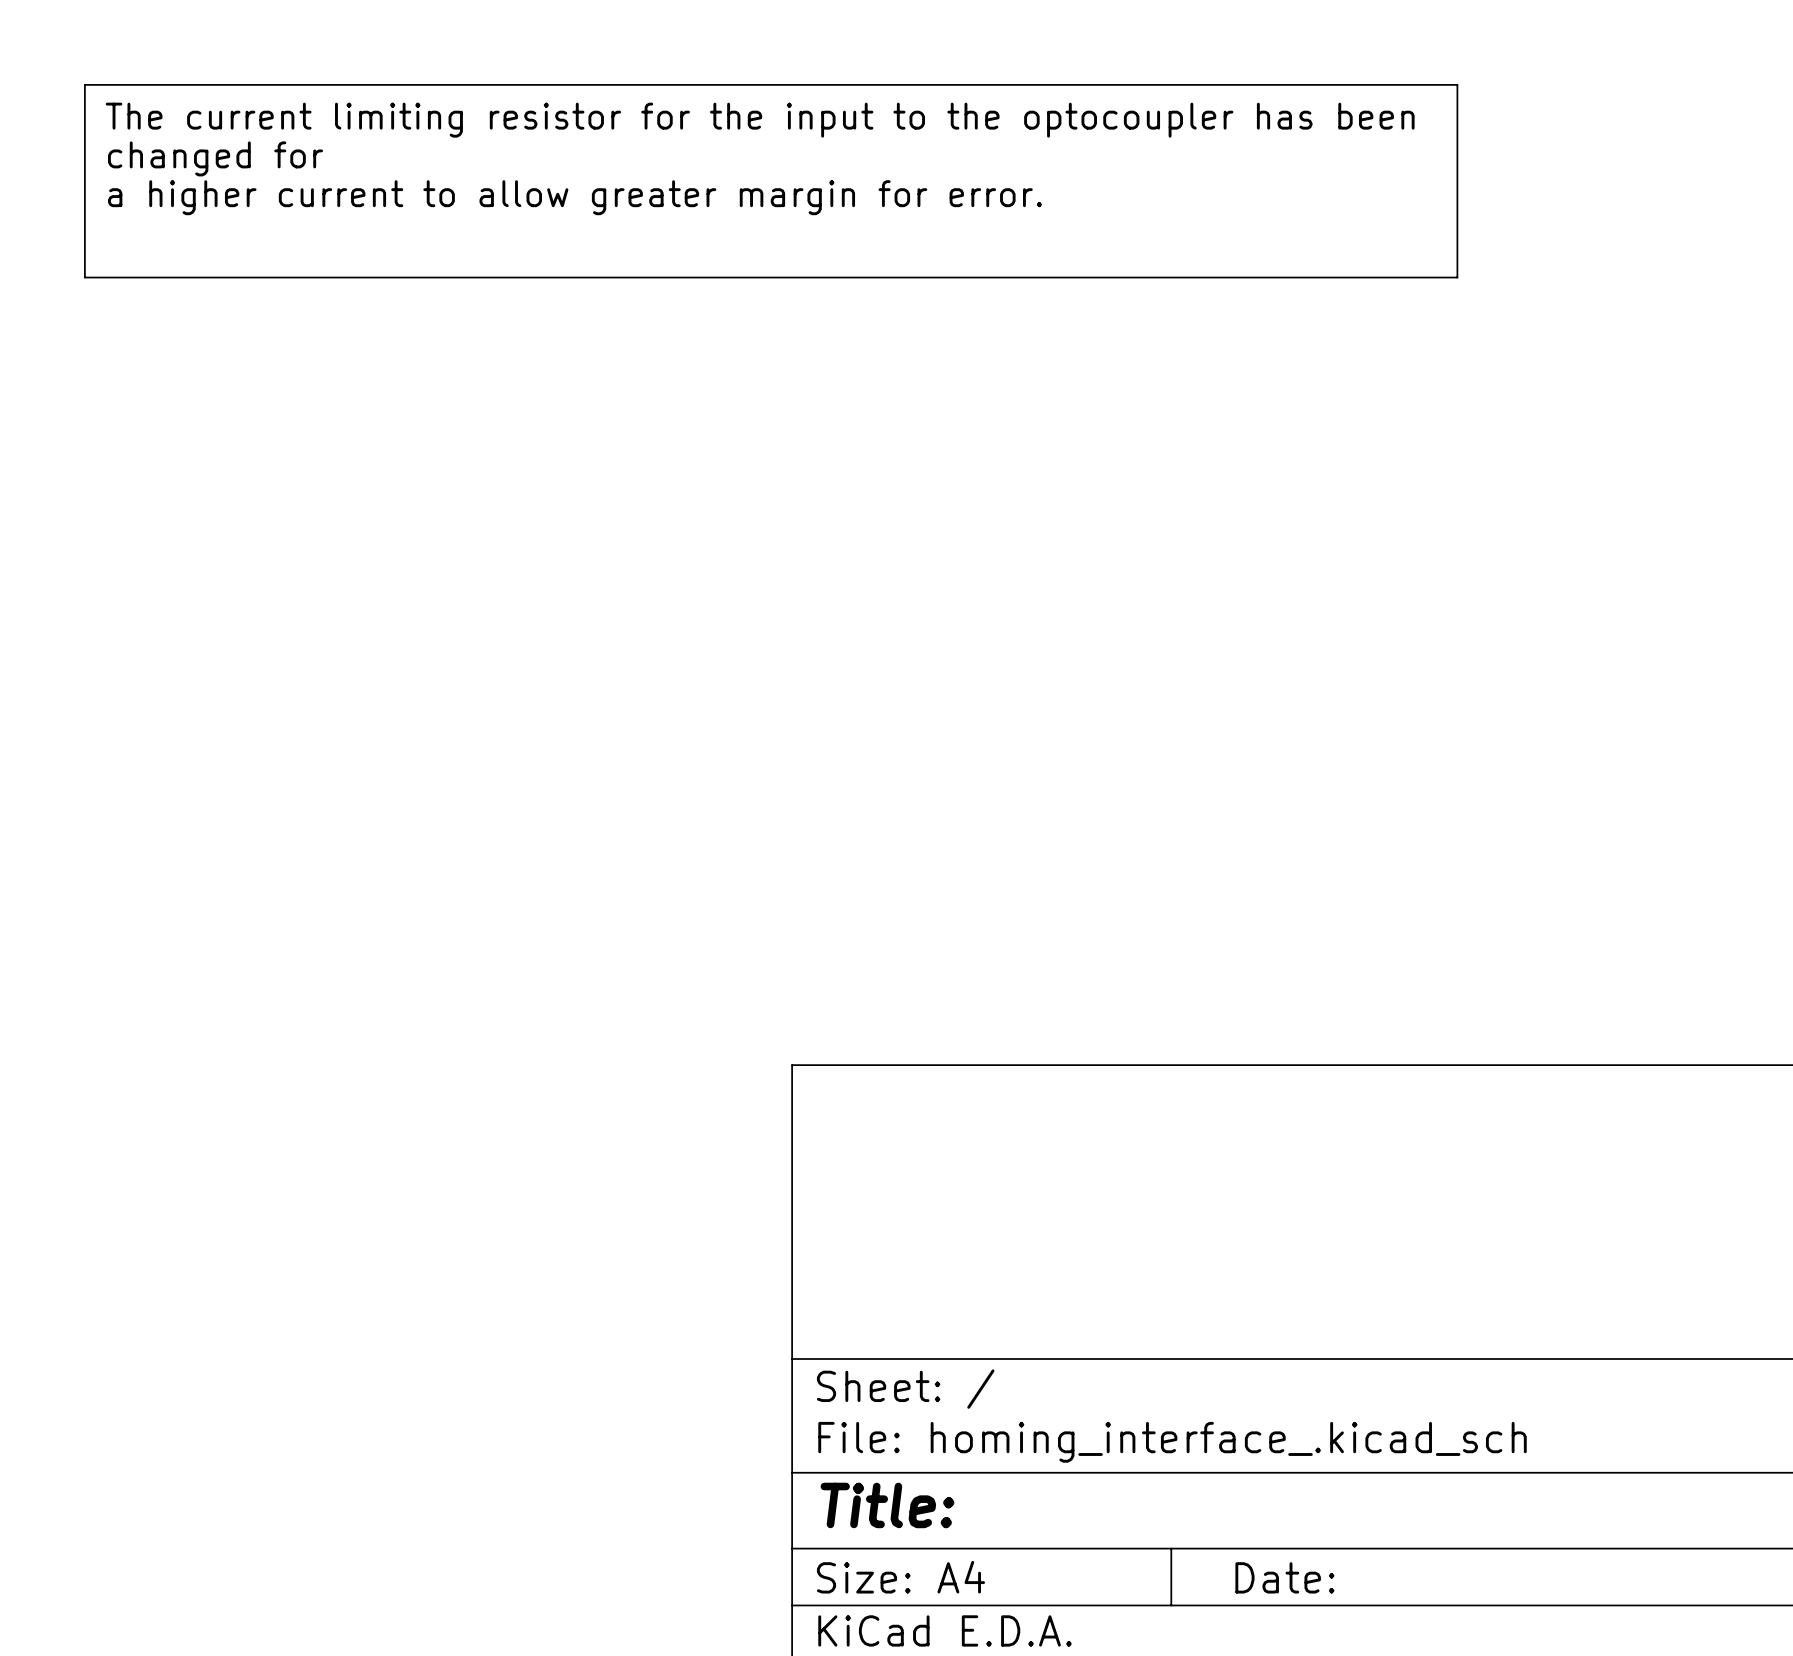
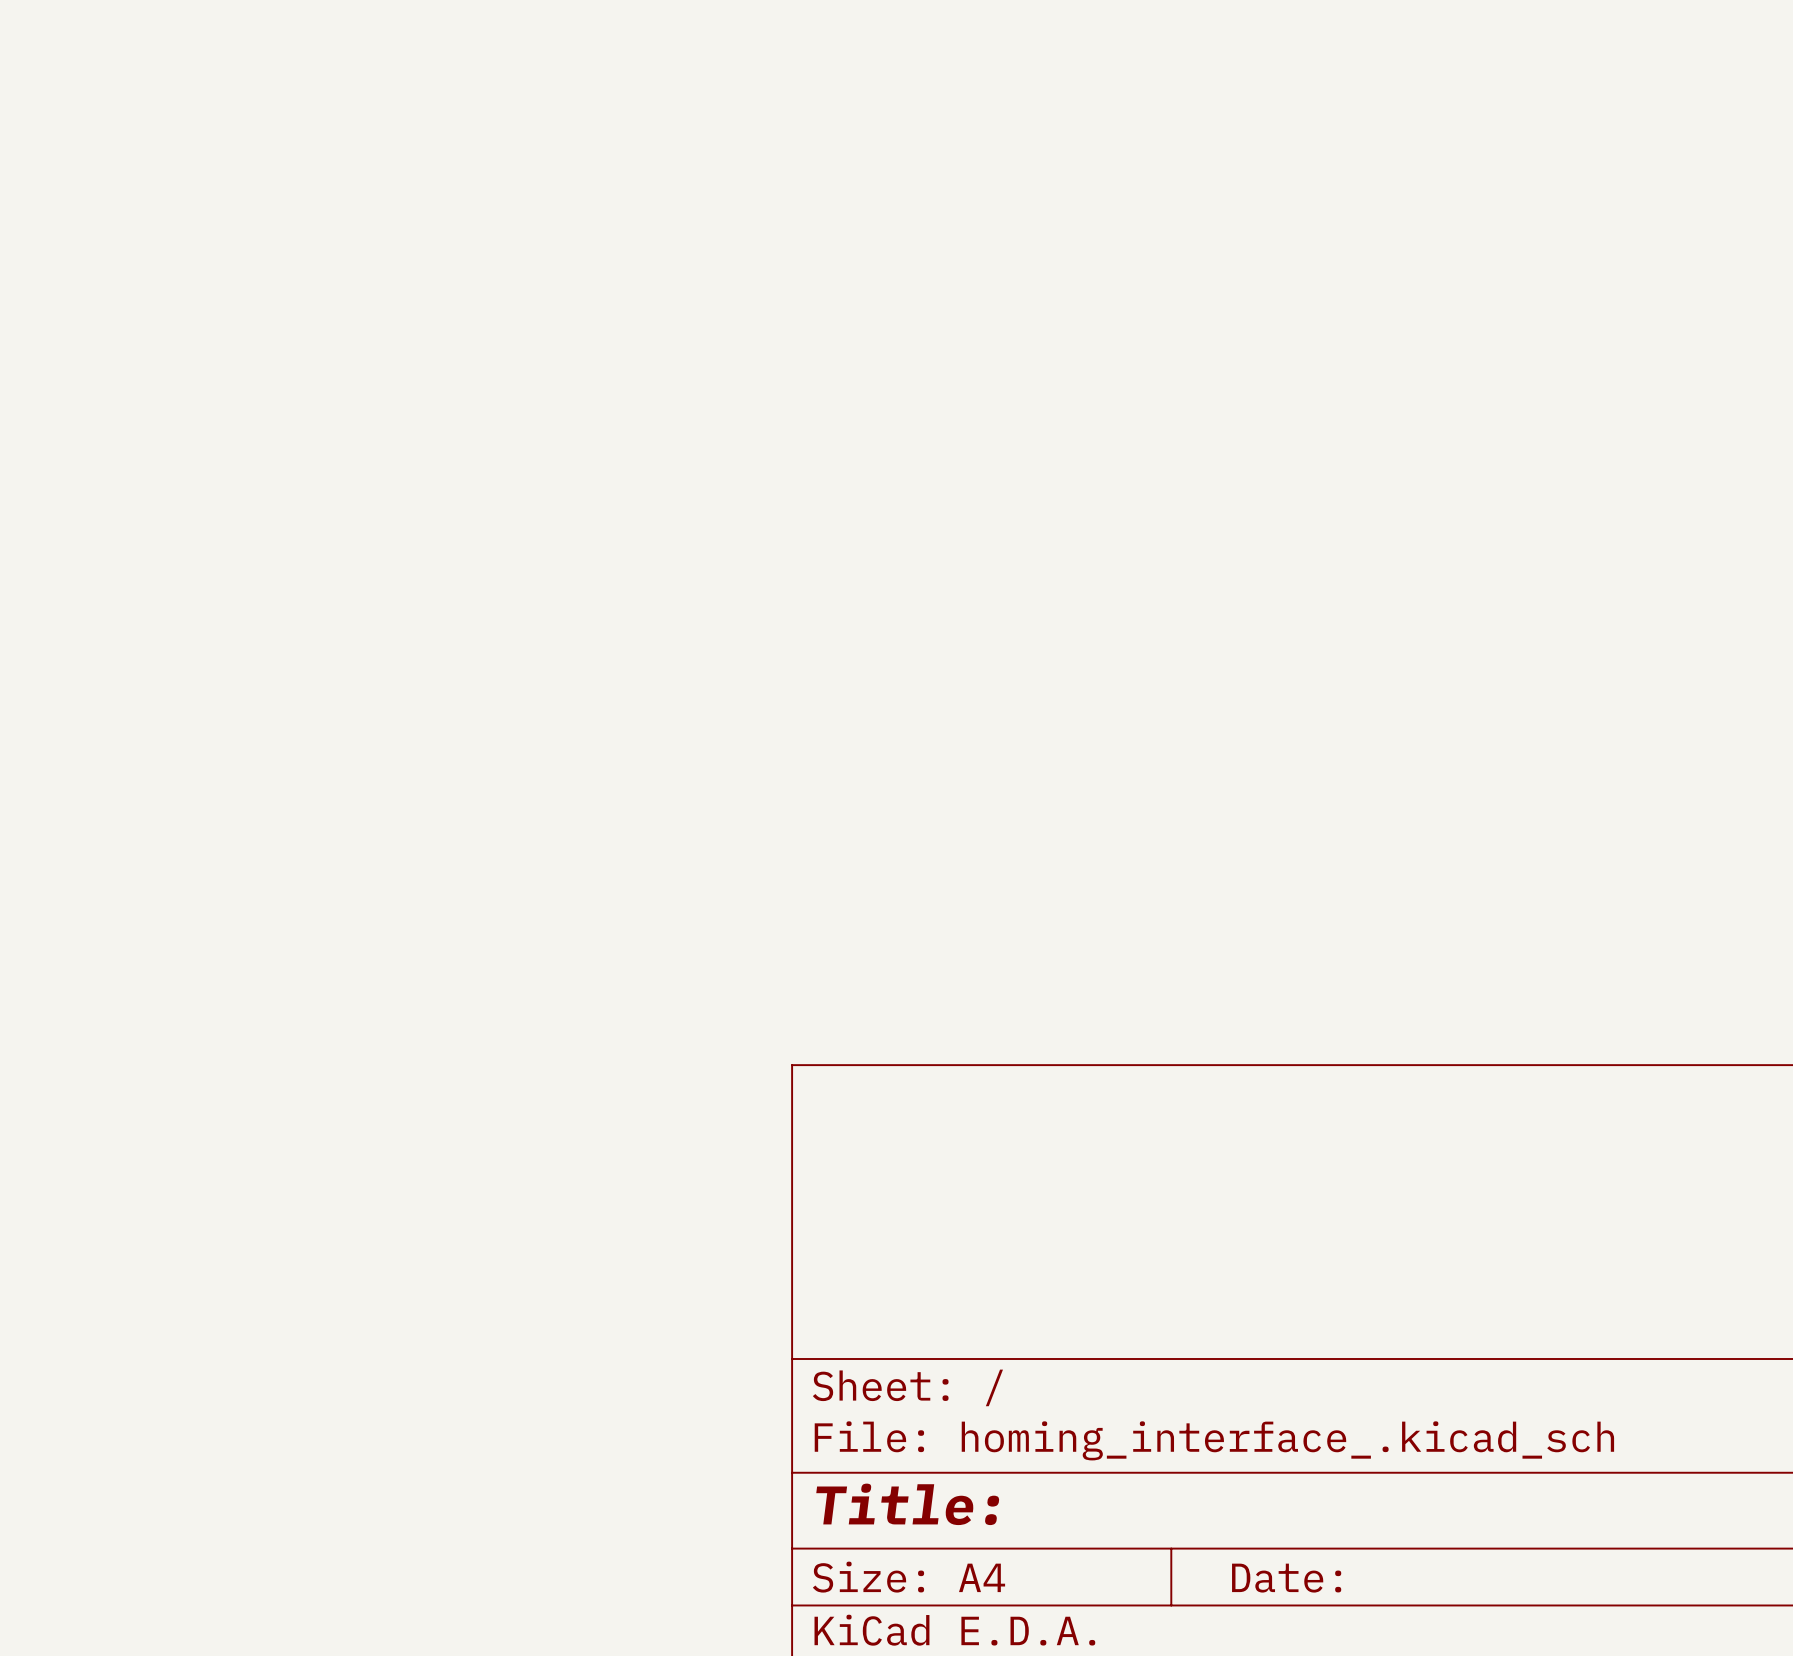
line: (84, 84) (84, 277) (1457, 277) (1457, 84) (84, 84) -> none
text: The current limiting resistor for the input to the optocoupler has been (760, 120) -> none
text: changed for (215, 158) -> none
text: a higher current to allow greater margin for error. (574, 197) -> none

